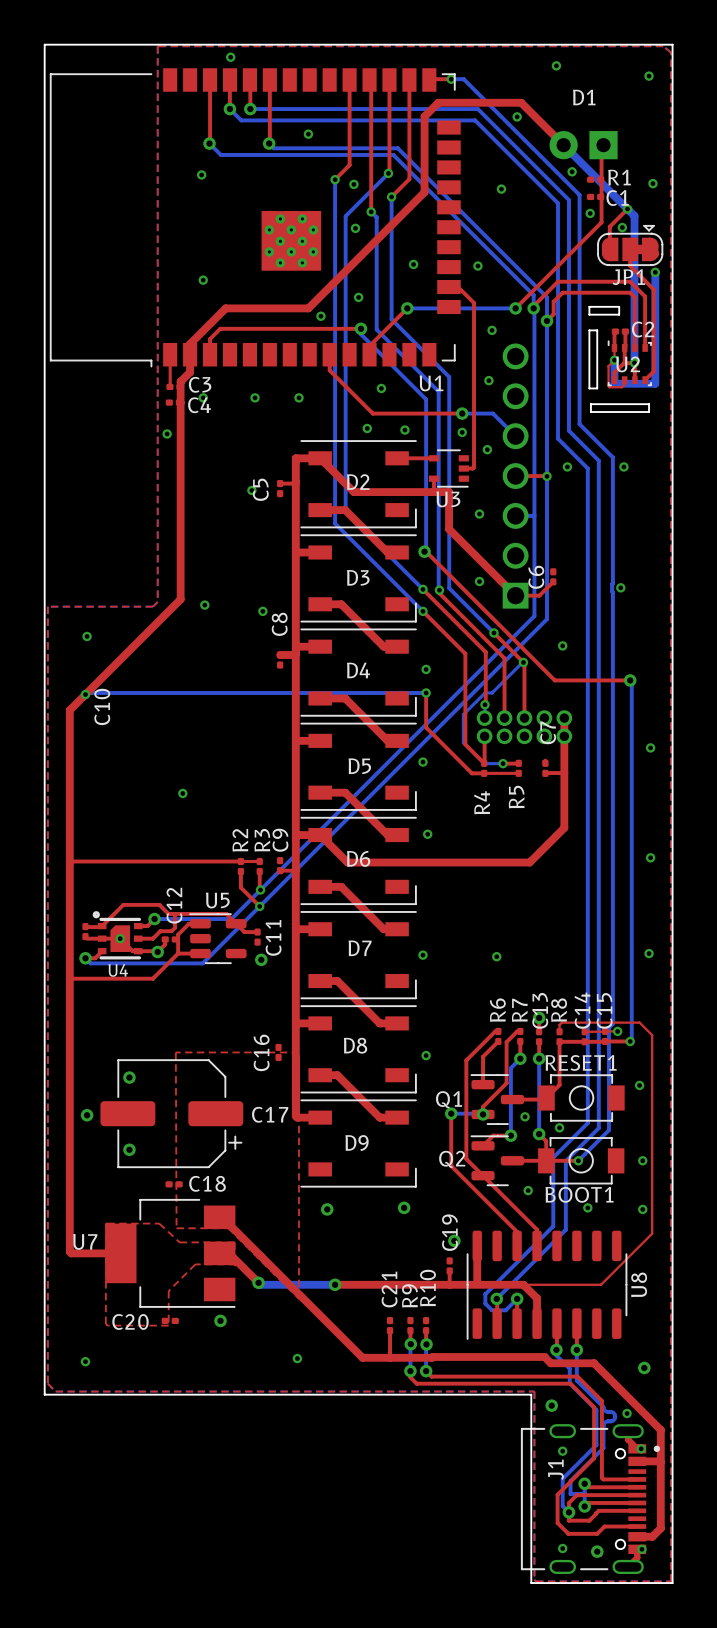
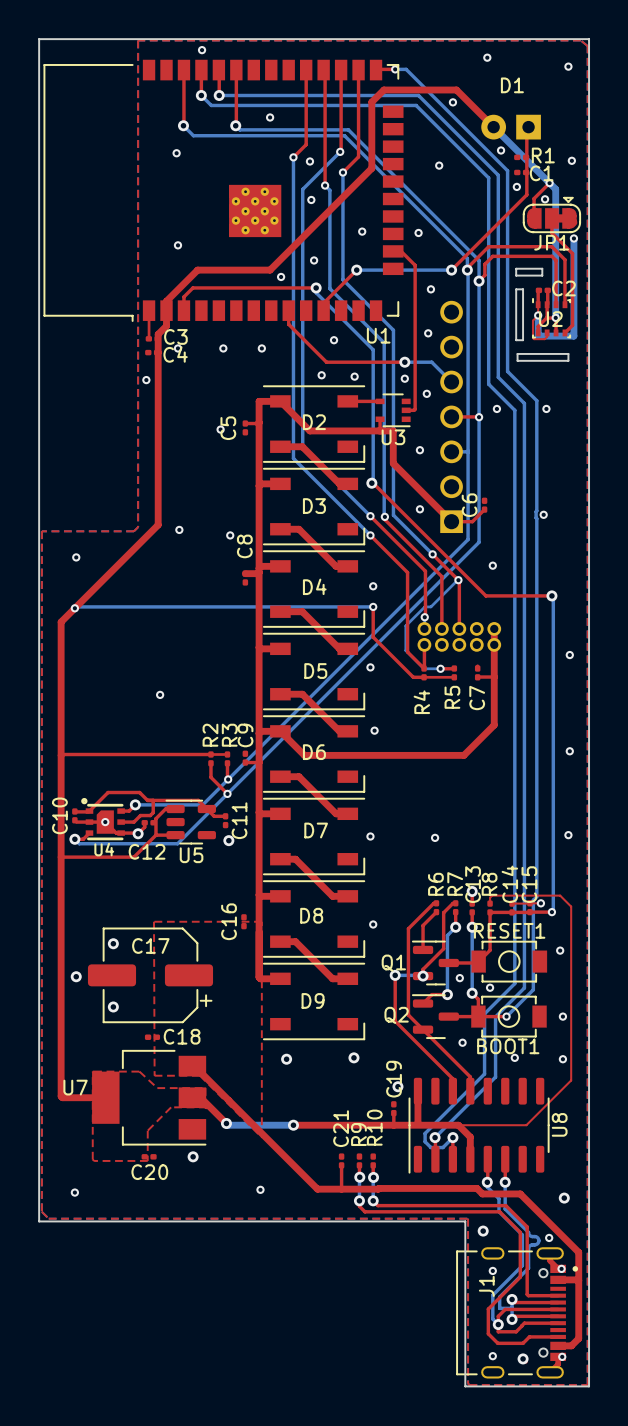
C10 name position: C10 (102, 706) -> C10 (59, 815)
C7 name position: C7 (548, 732) -> C7 (477, 698)
U5 name position: U5 (217, 900) -> U5 (191, 855)
C12 name rotation: 0° (174, 905) -> 90° clockwise (147, 851)
C12 name position: C12 (174, 905) -> C12 (147, 851)
C17 name position: C17 (270, 1114) -> C17 (150, 945)
C20 name position: C20 (130, 1321) -> C20 (149, 1172)

